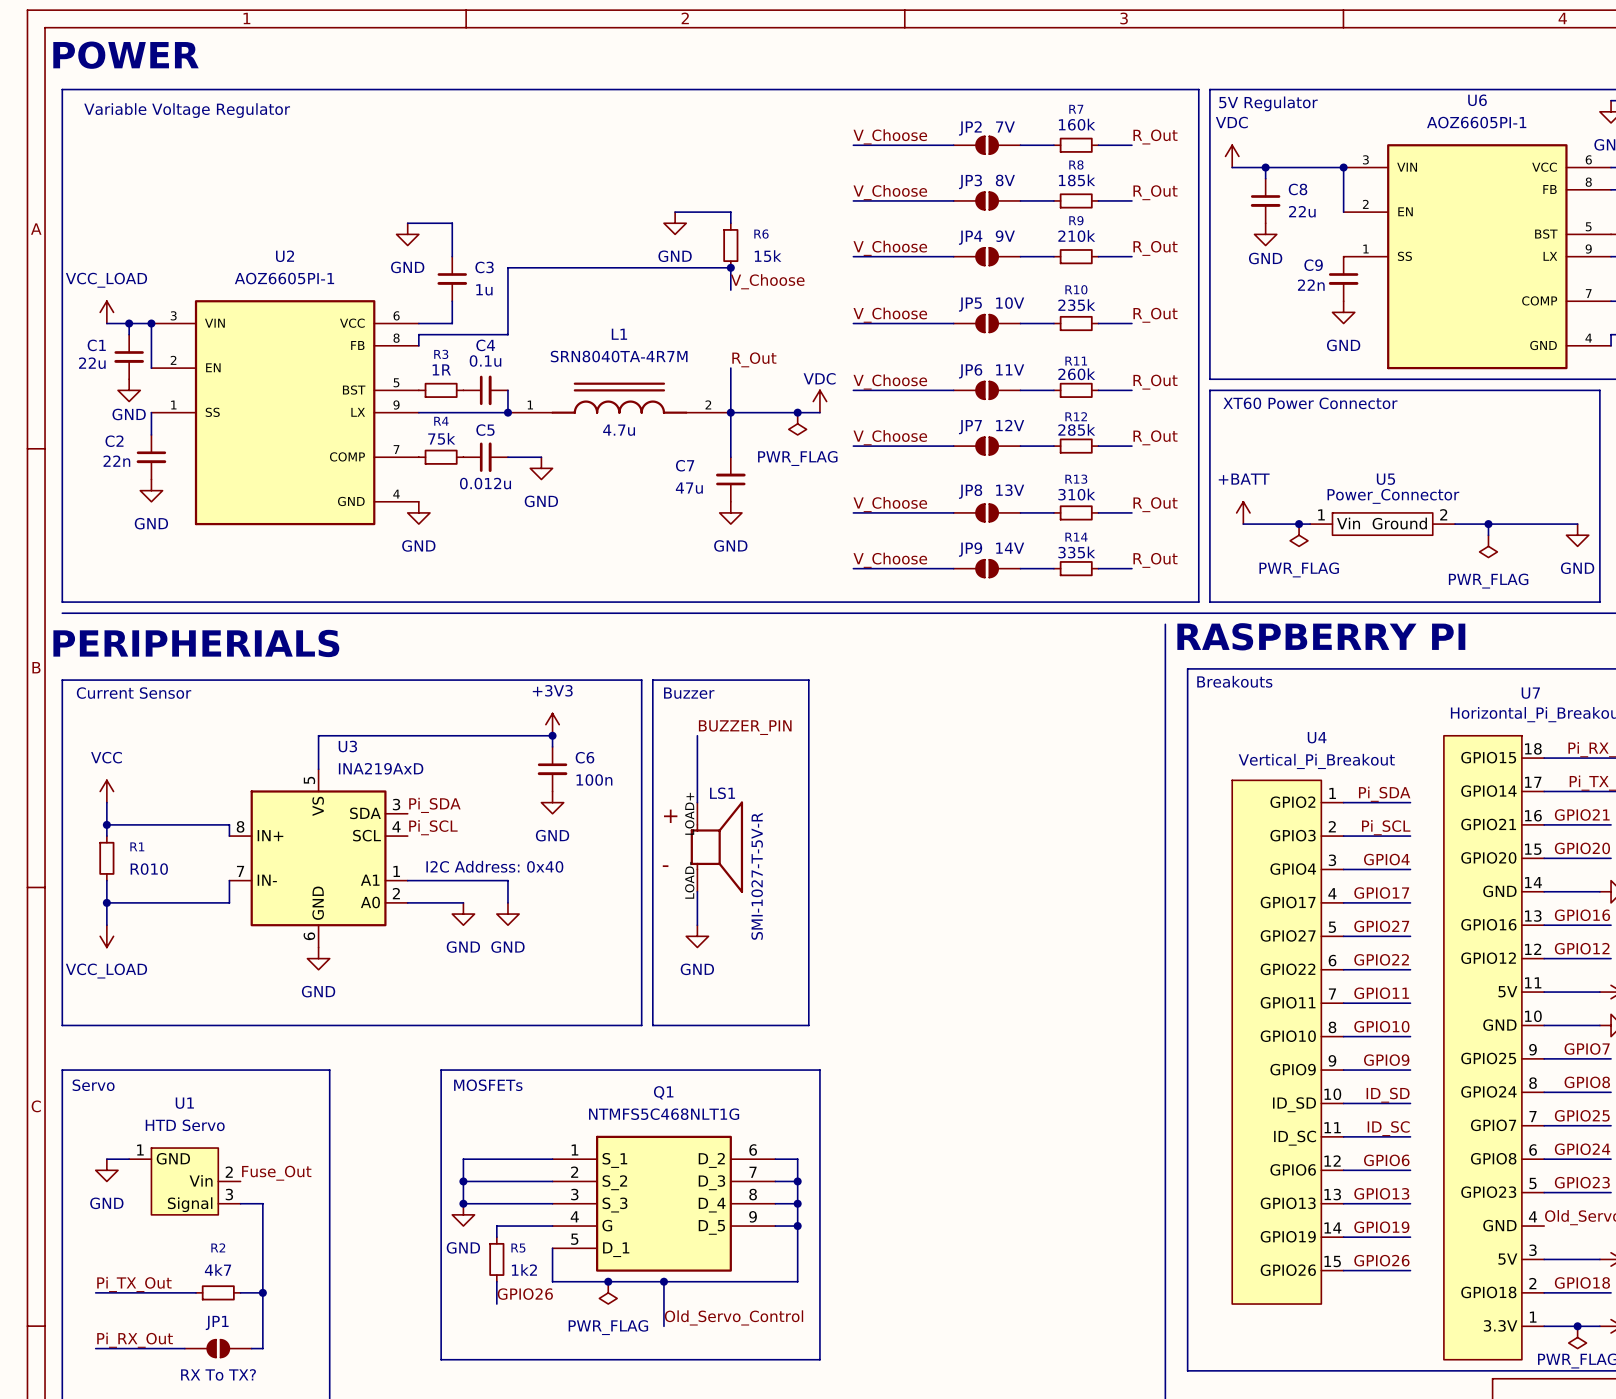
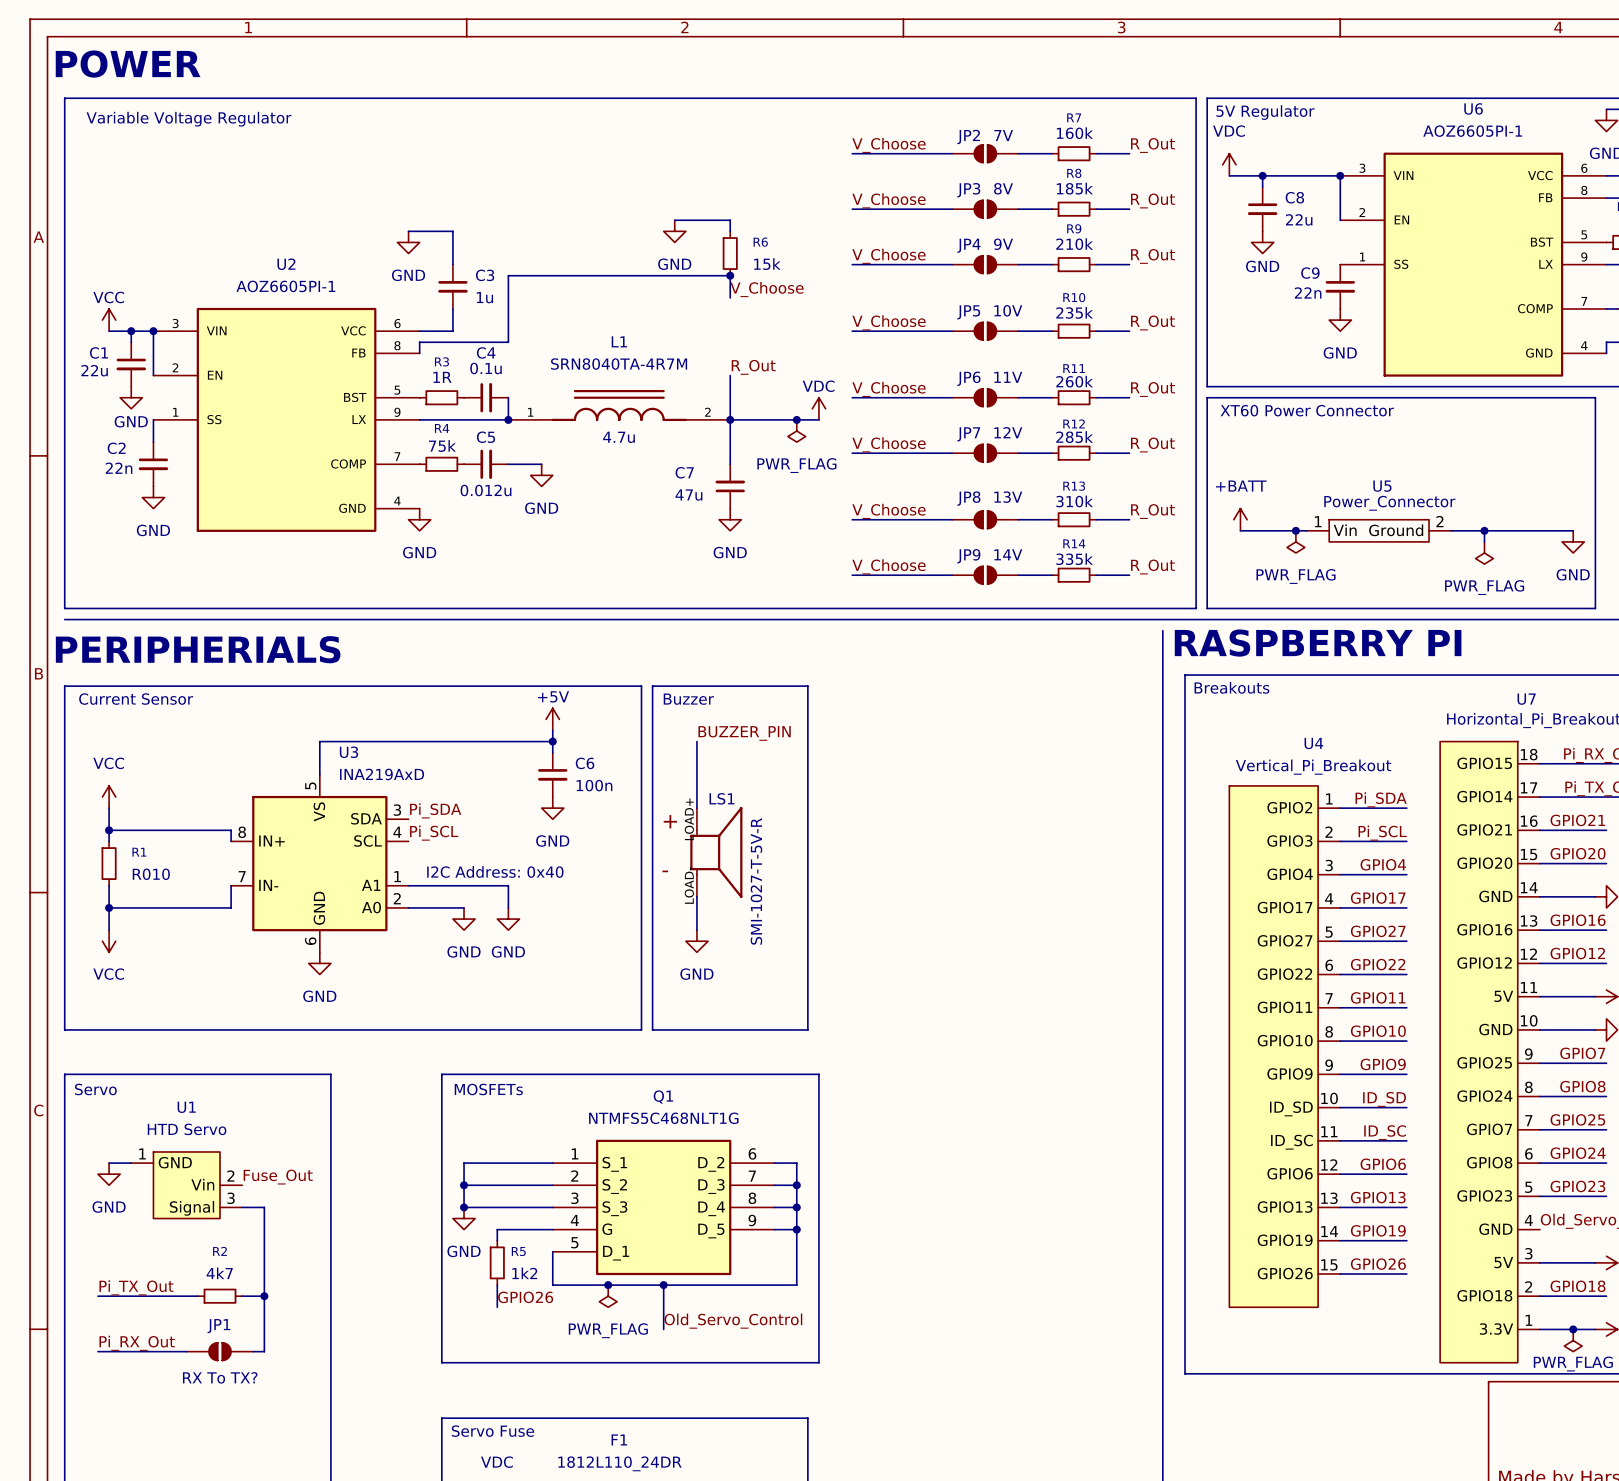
power symbol: VCC_LOAD (106, 312) -> VCC (109, 320)
power symbol: none -> +5V (552, 719)
power symbol: +3V3 (552, 724) -> none
power symbol: VCC_LOAD (106, 936) -> VCC (109, 941)

